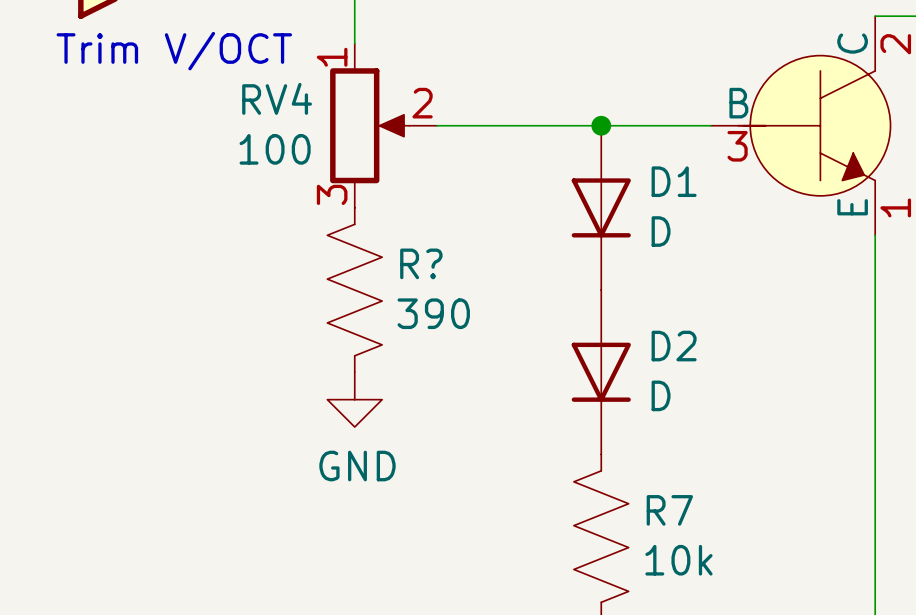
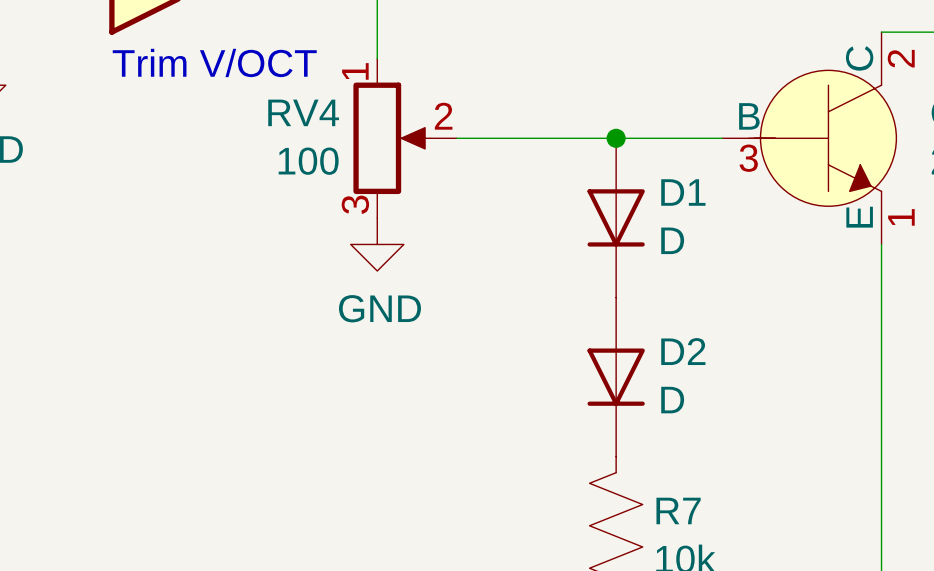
text position: Trim V/OCT (174, 51) -> Trim V/OCT (214, 62)
R?: 390 (354, 290) -> none
power symbol position: GND (354, 399) -> GND (377, 244)

